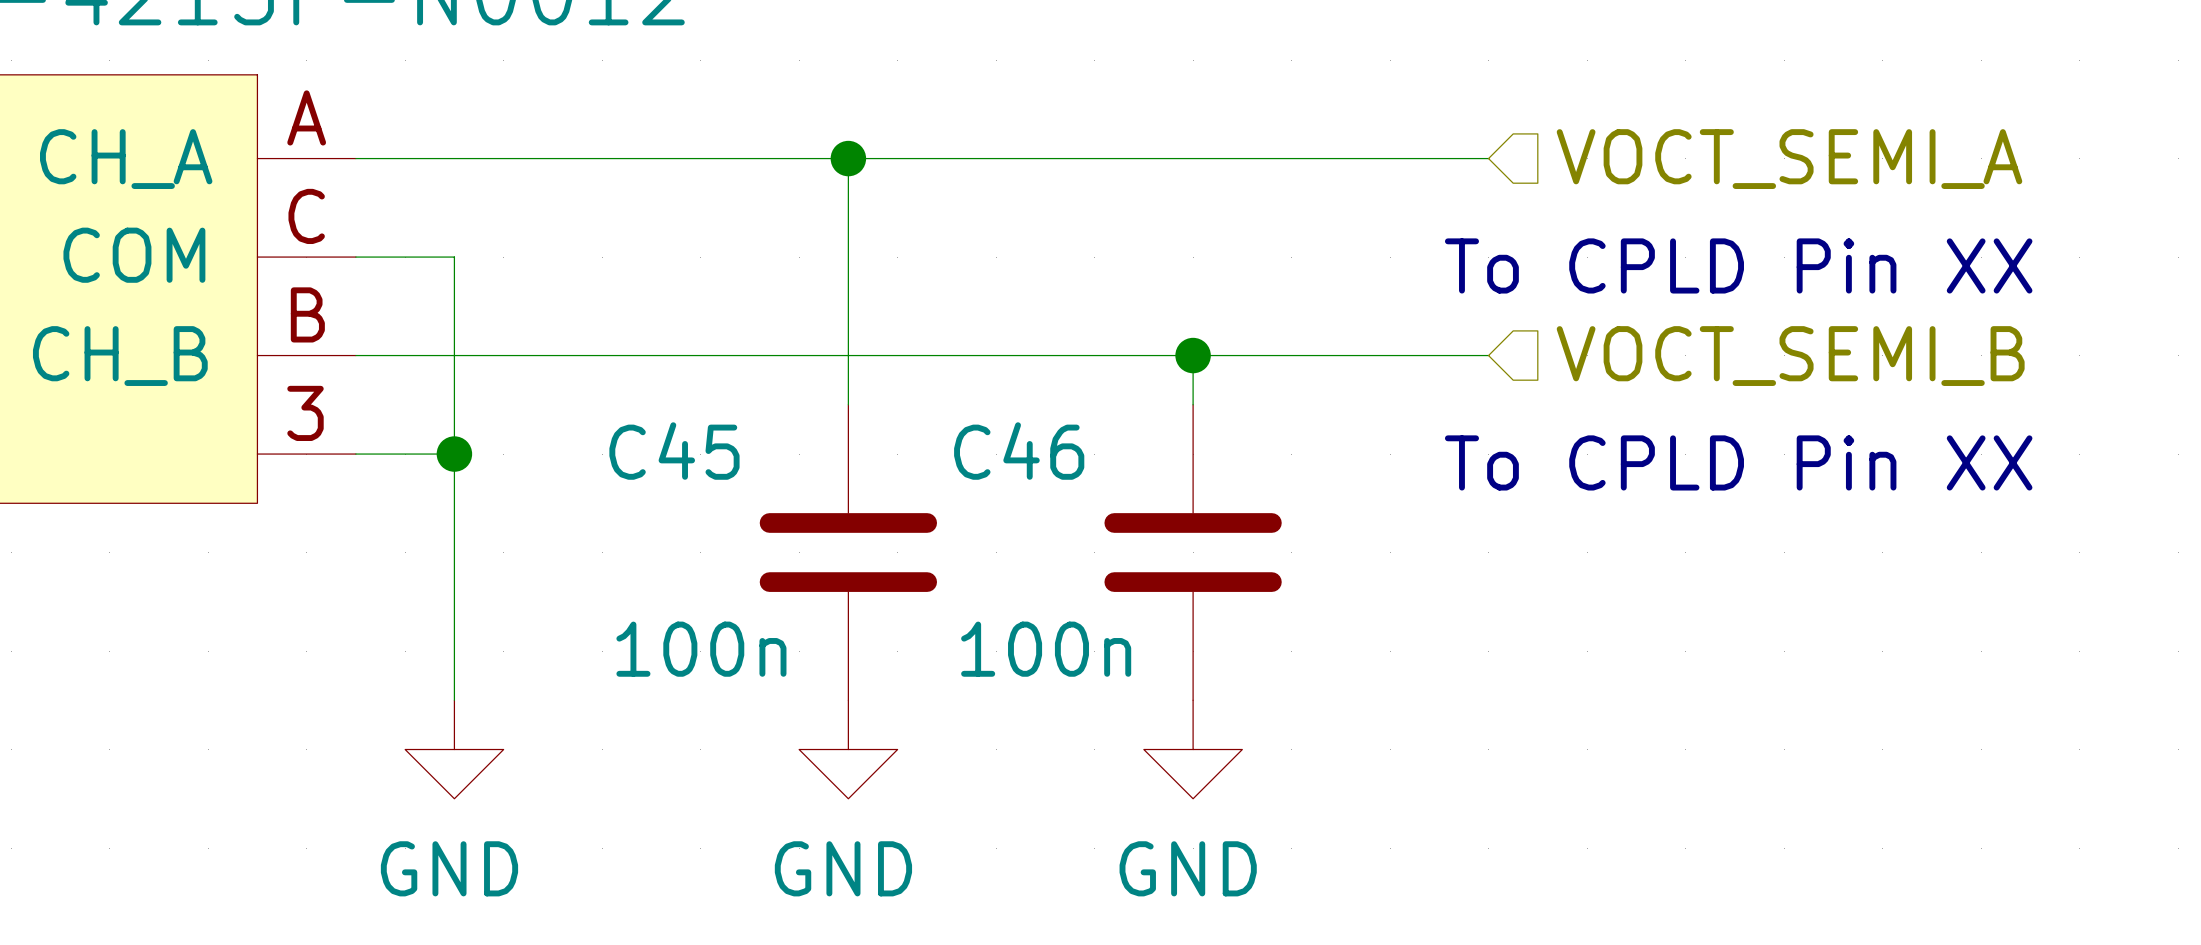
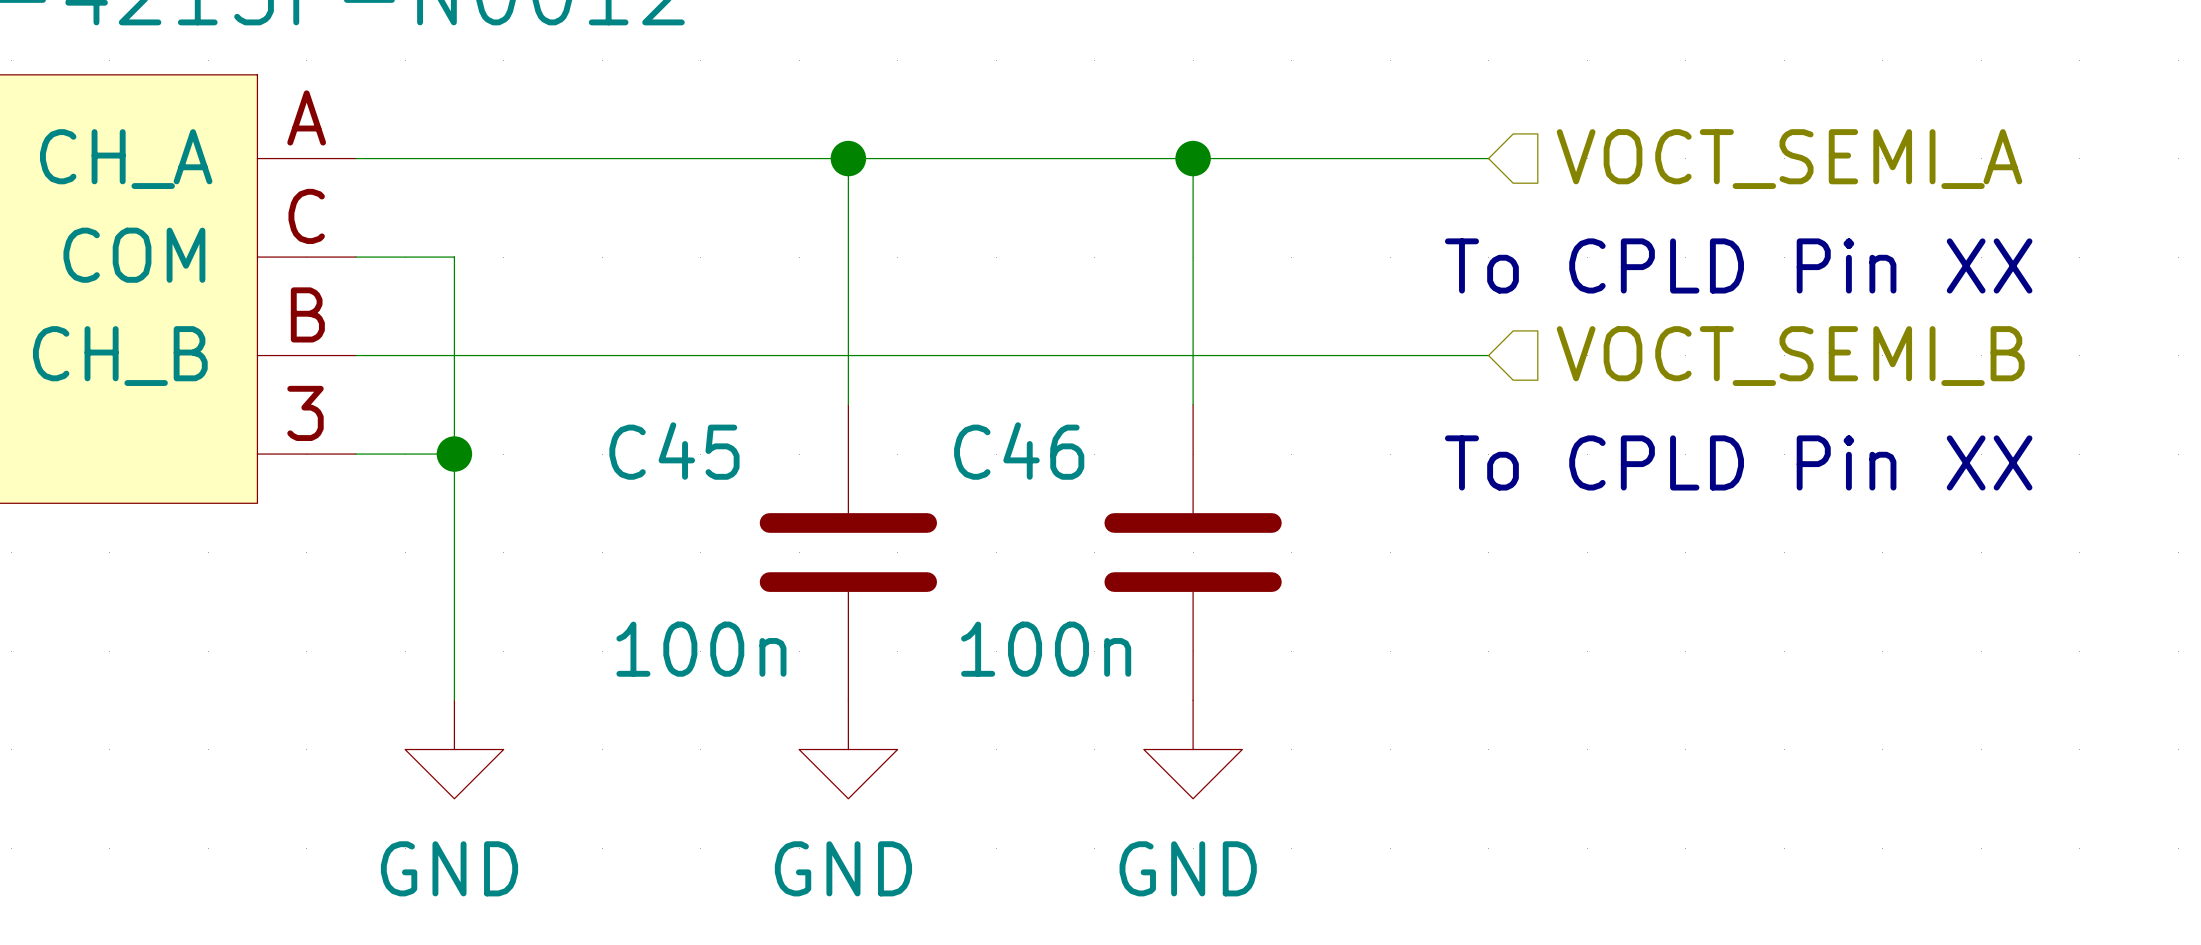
wire: none -> (1193, 158) (1193, 355)
junction position: (1193, 355) -> (1193, 158)

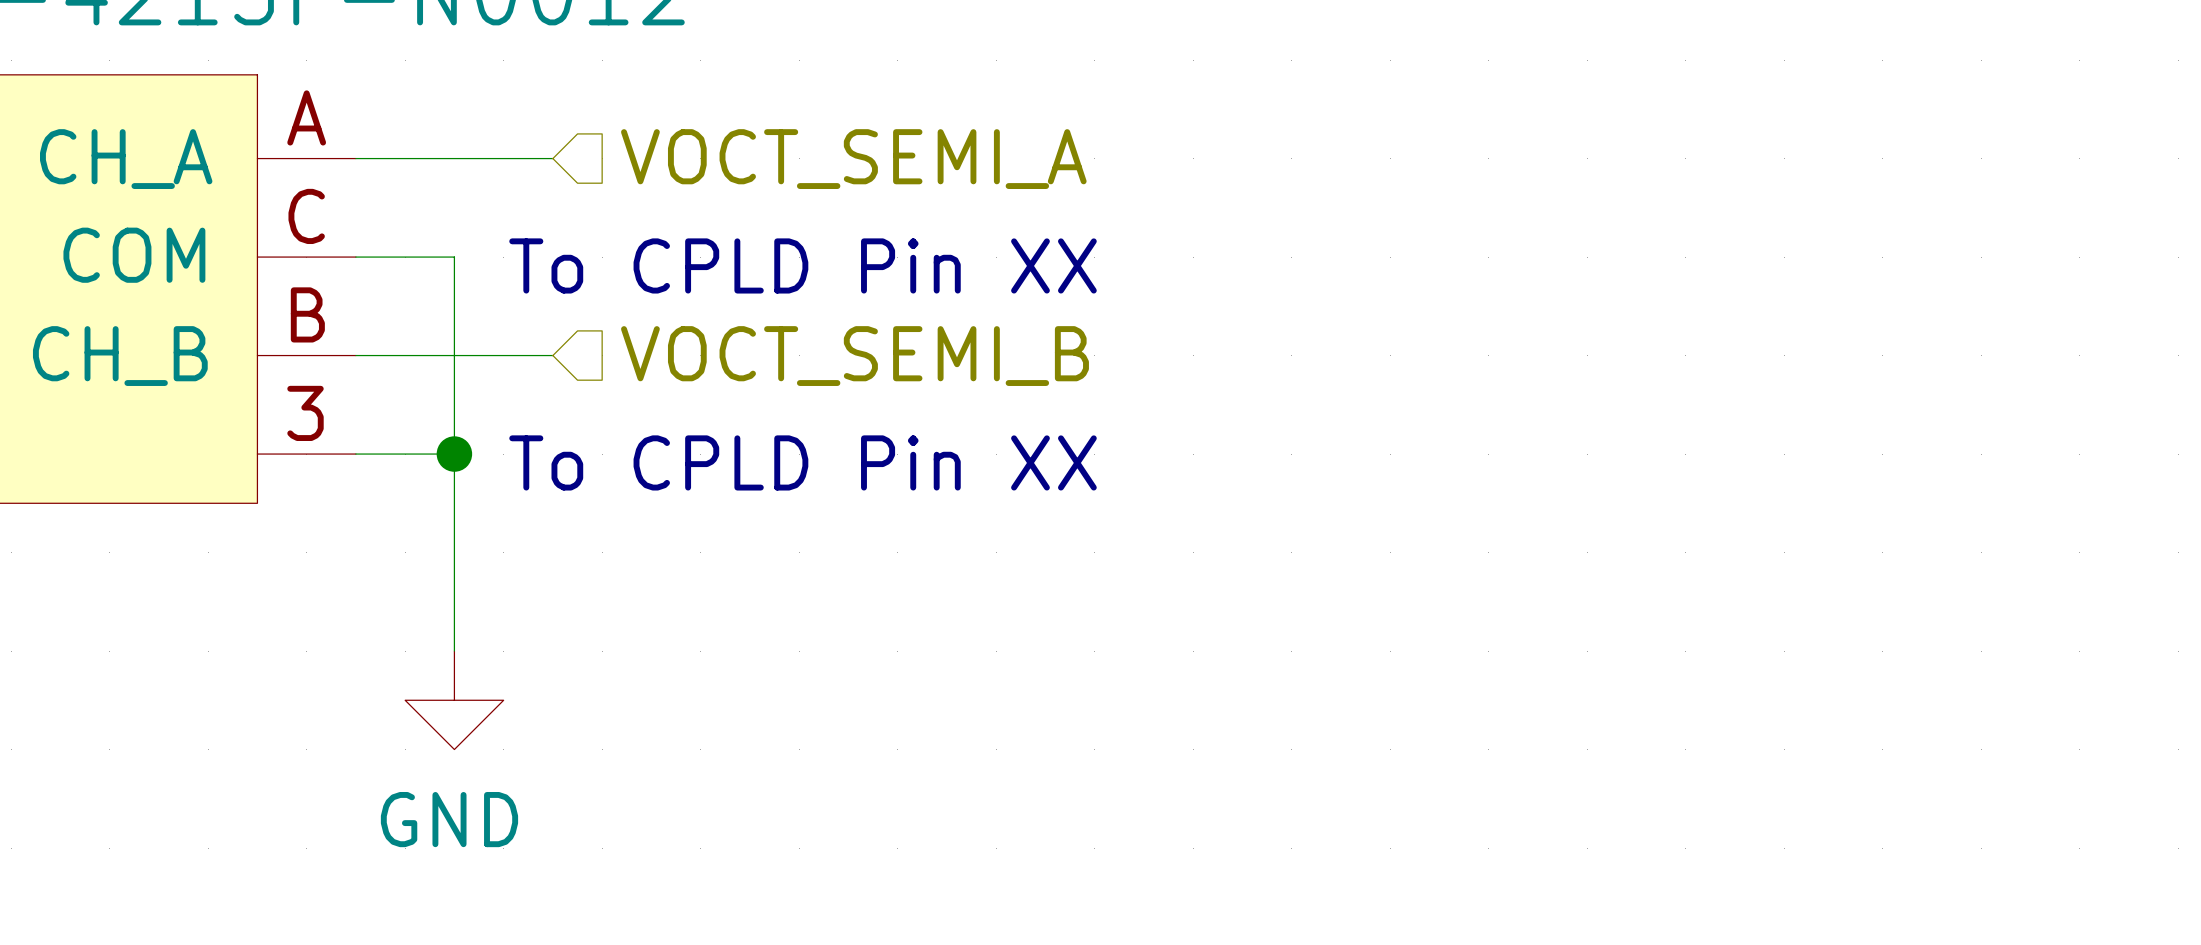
wire: (552, 158) (1488, 158) -> none
wire: (848, 158) (848, 404) -> none
junction: (848, 158) -> none
wire: (1193, 158) (1193, 404) -> none
junction: (1193, 158) -> none
hierarchical label position: VOCT_SEMI_A (1789, 159) -> VOCT_SEMI_A (853, 159)
text: none -> To CPLD Pin XX (803, 265)
text: To CPLD Pin XX (1738, 265) -> none
wire: (552, 355) (1488, 355) -> none
hierarchical label position: VOCT_SEMI_B (1790, 356) -> VOCT_SEMI_B (855, 356)
text: none -> To CPLD Pin XX (803, 462)
text: To CPLD Pin XX (1738, 462) -> none
C45: 100n (848, 552) -> none
C46: 100n (1193, 552) -> none
power symbol position: GND (454, 749) -> GND (454, 700)
power symbol: GND (848, 749) -> none
power symbol: GND (1193, 749) -> none

